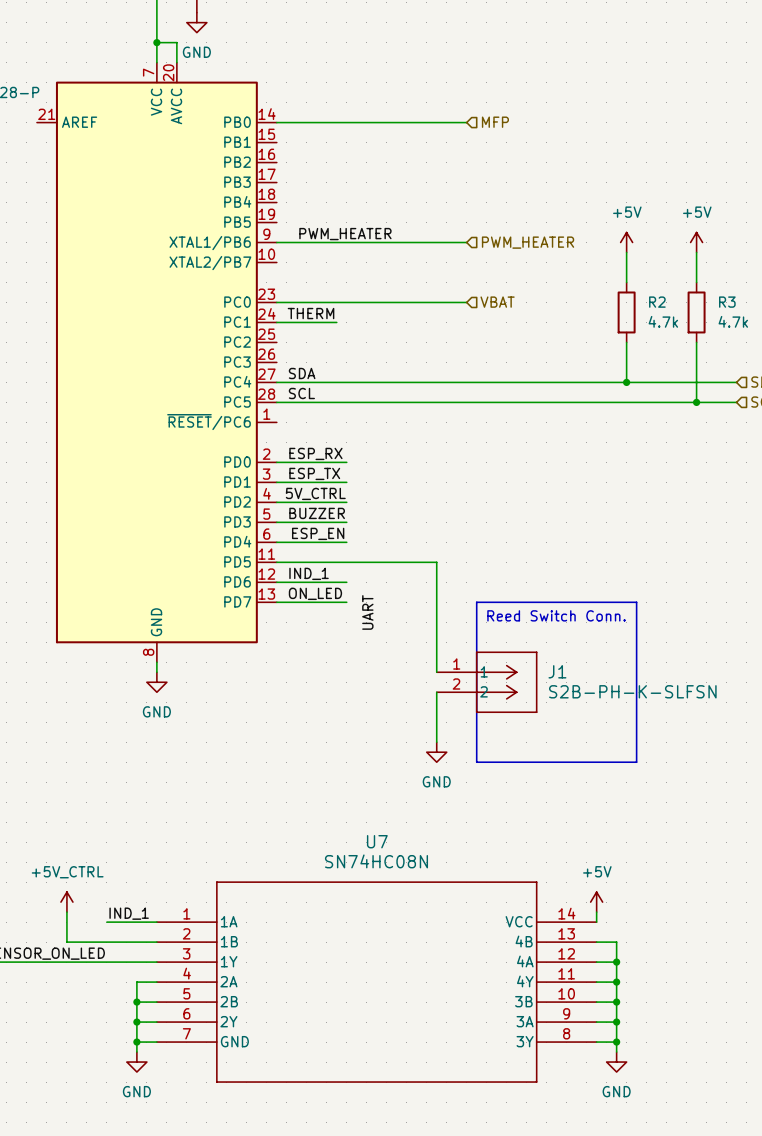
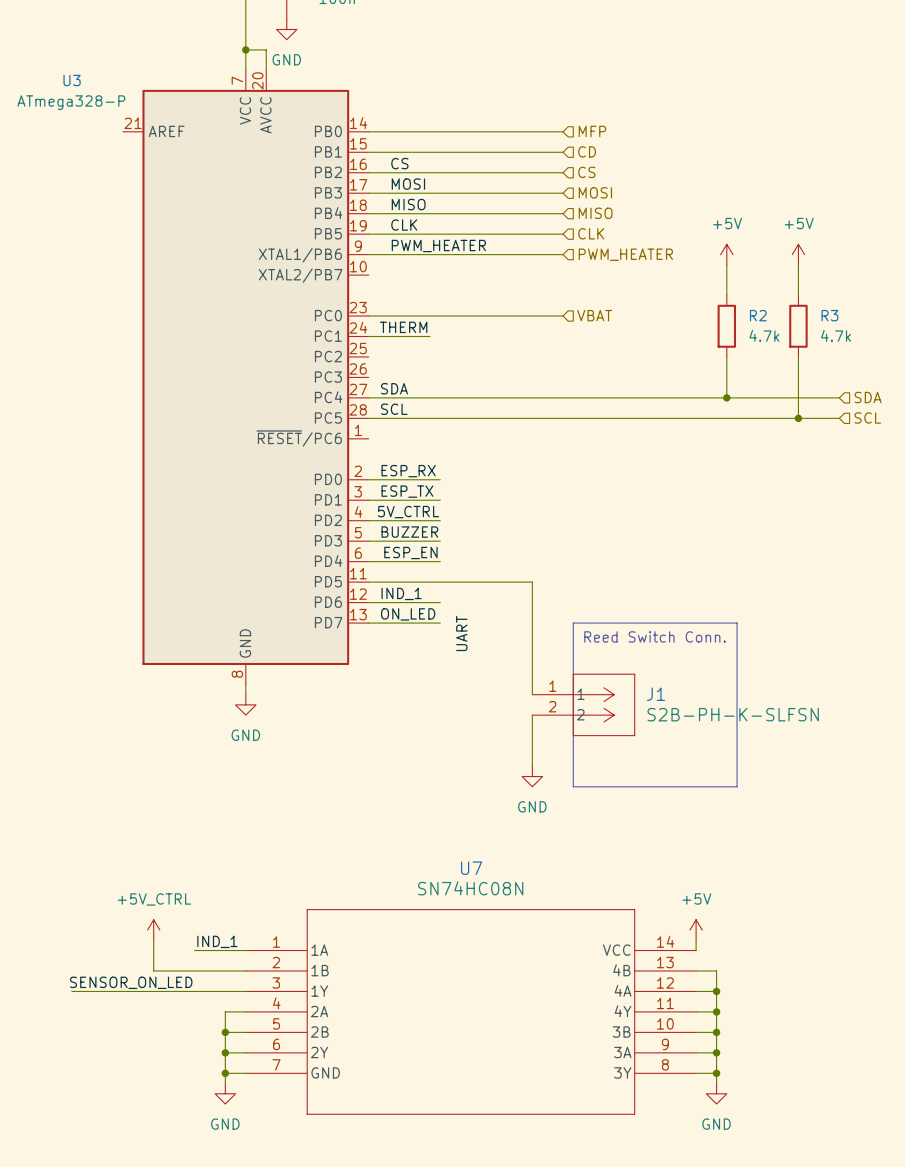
wire: none -> (368, 152) (563, 152)
hierarchical label: none -> CD (587, 151)
label: none -> CS (399, 163)
wire: none -> (368, 172) (563, 172)
hierarchical label: none -> CS (586, 172)
label: none -> MOSI (408, 184)
wire: none -> (368, 193) (563, 193)
hierarchical label: none -> MOSI (595, 192)
label: none -> MISO (408, 204)
wire: none -> (368, 213) (563, 213)
hierarchical label: none -> MISO (595, 213)
label: none -> CLK (404, 225)
wire: none -> (368, 234) (563, 234)
hierarchical label: none -> CLK (591, 233)

